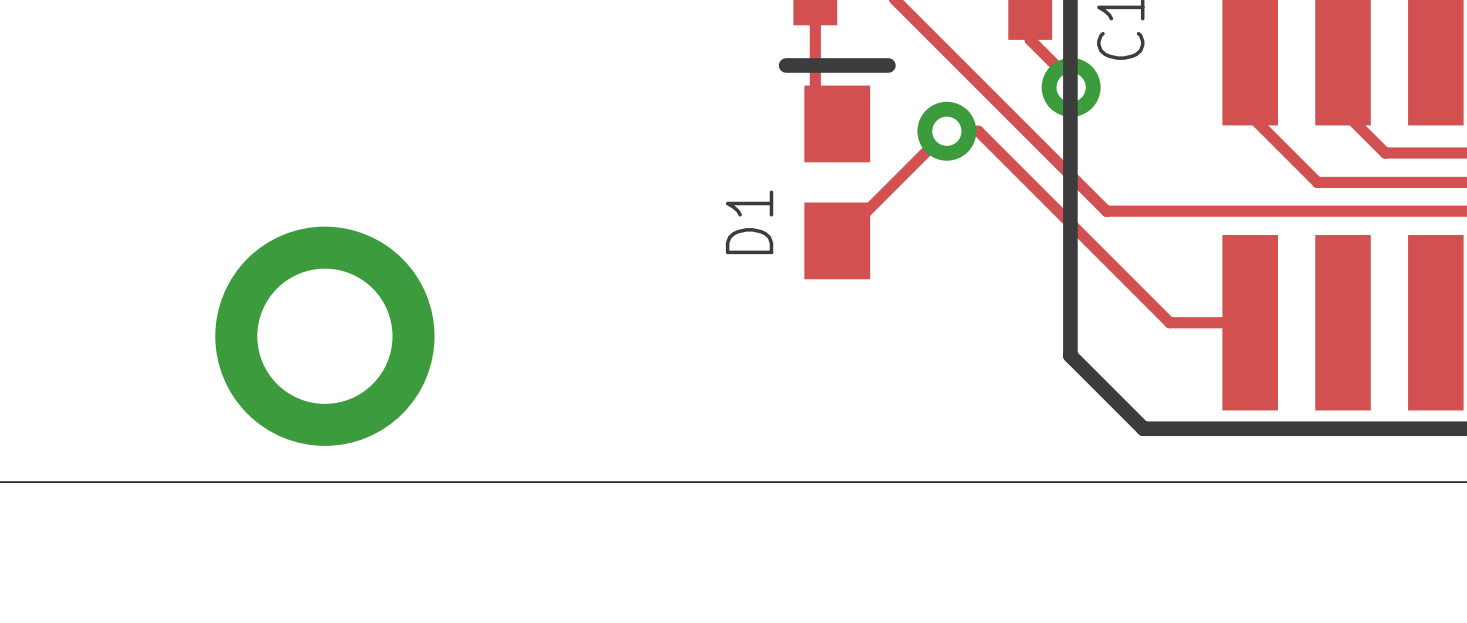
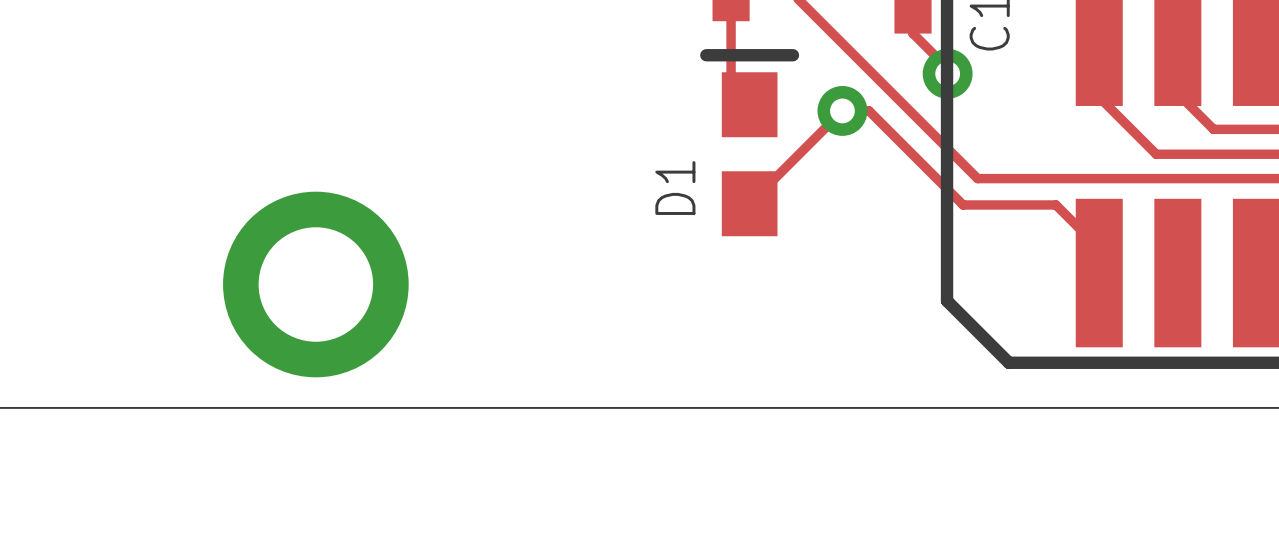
track: (1089, 242) (1169, 322) (1250, 322) -> (963, 204) (1055, 204) (1099, 248) (1099, 273)

